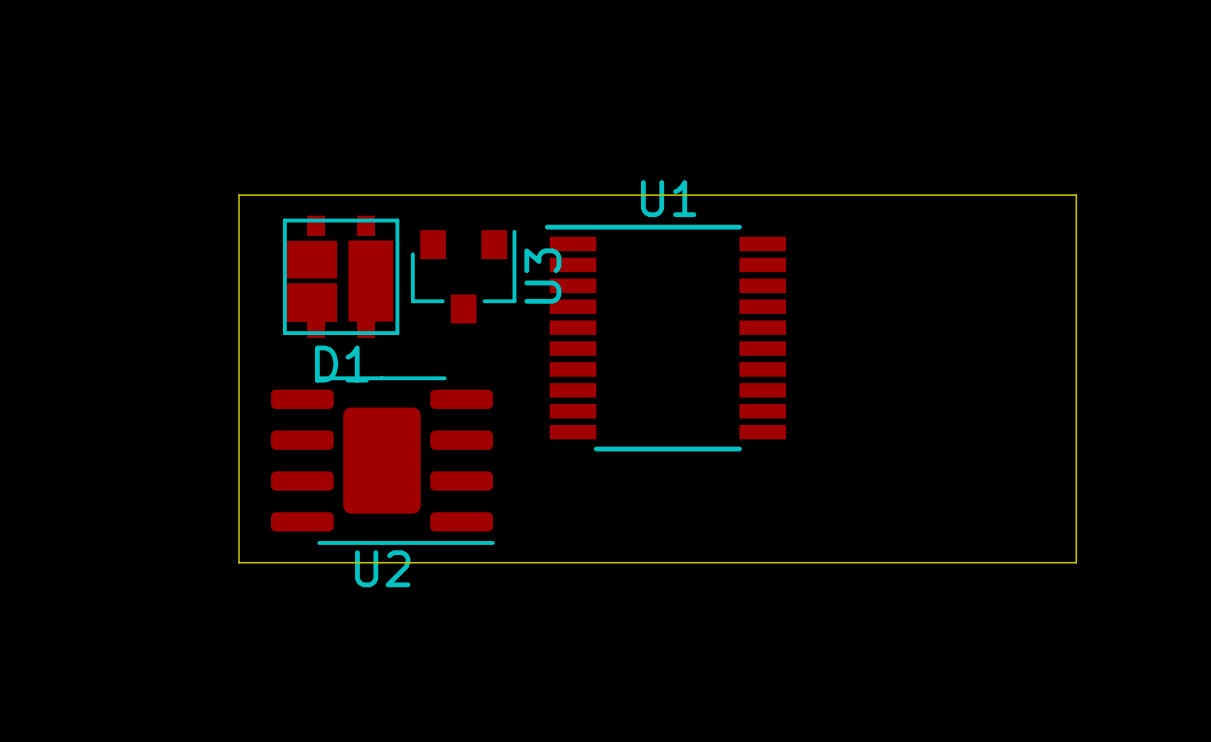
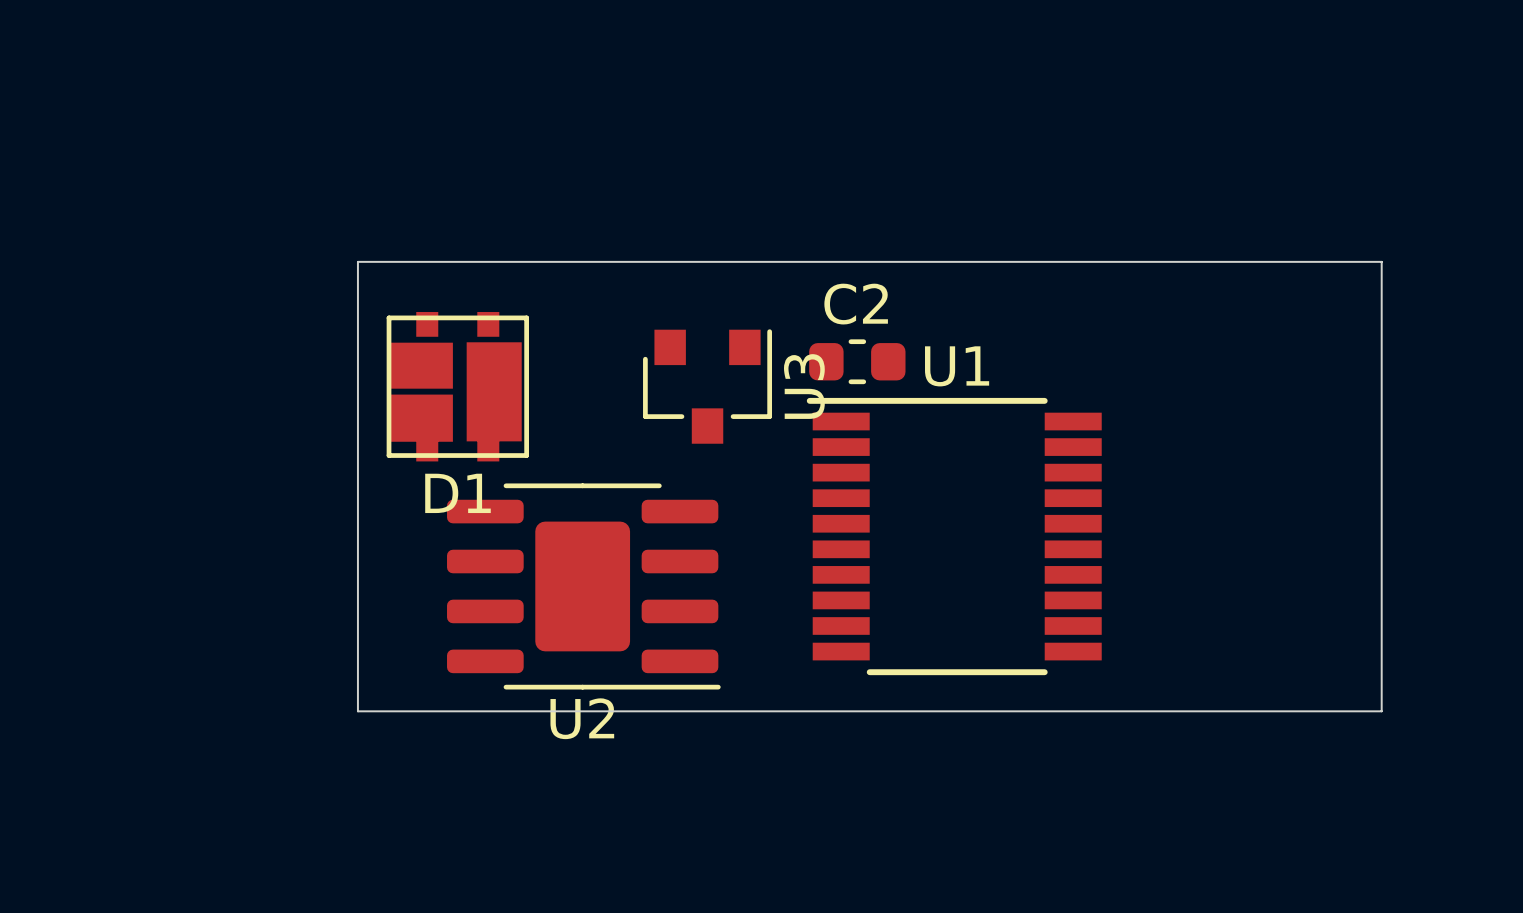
D1 position: (341, 276) -> (457, 386)
U3 position: (463, 276) -> (707, 386)
C2: none -> (857, 361)
U1 position: (665, 338) -> (954, 536)
U2 position: (382, 460) -> (583, 586)

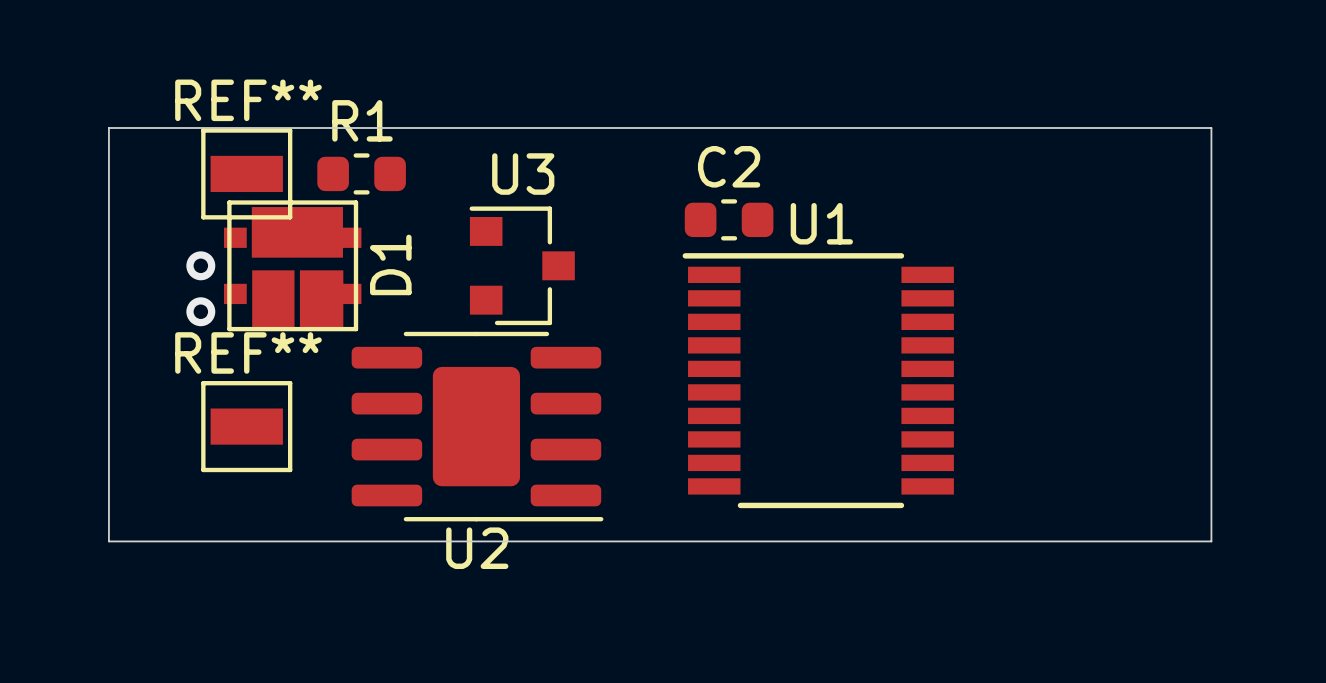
board edge: (357, 261) (357, 711) -> (269, 128) (108, 128) (108, 541) (269, 541)
REF**: none -> (246, 173)
R1: none -> (361, 173)
D1 rotation: 0° (457, 386) -> 90° counterclockwise (292, 265)
U3 rotation: 0° (707, 386) -> 90° counterclockwise (522, 265)
U3 position: (707, 386) -> (522, 265)
via: none -> (200, 265)
via: none -> (200, 311)
REF**: none -> (246, 426)

